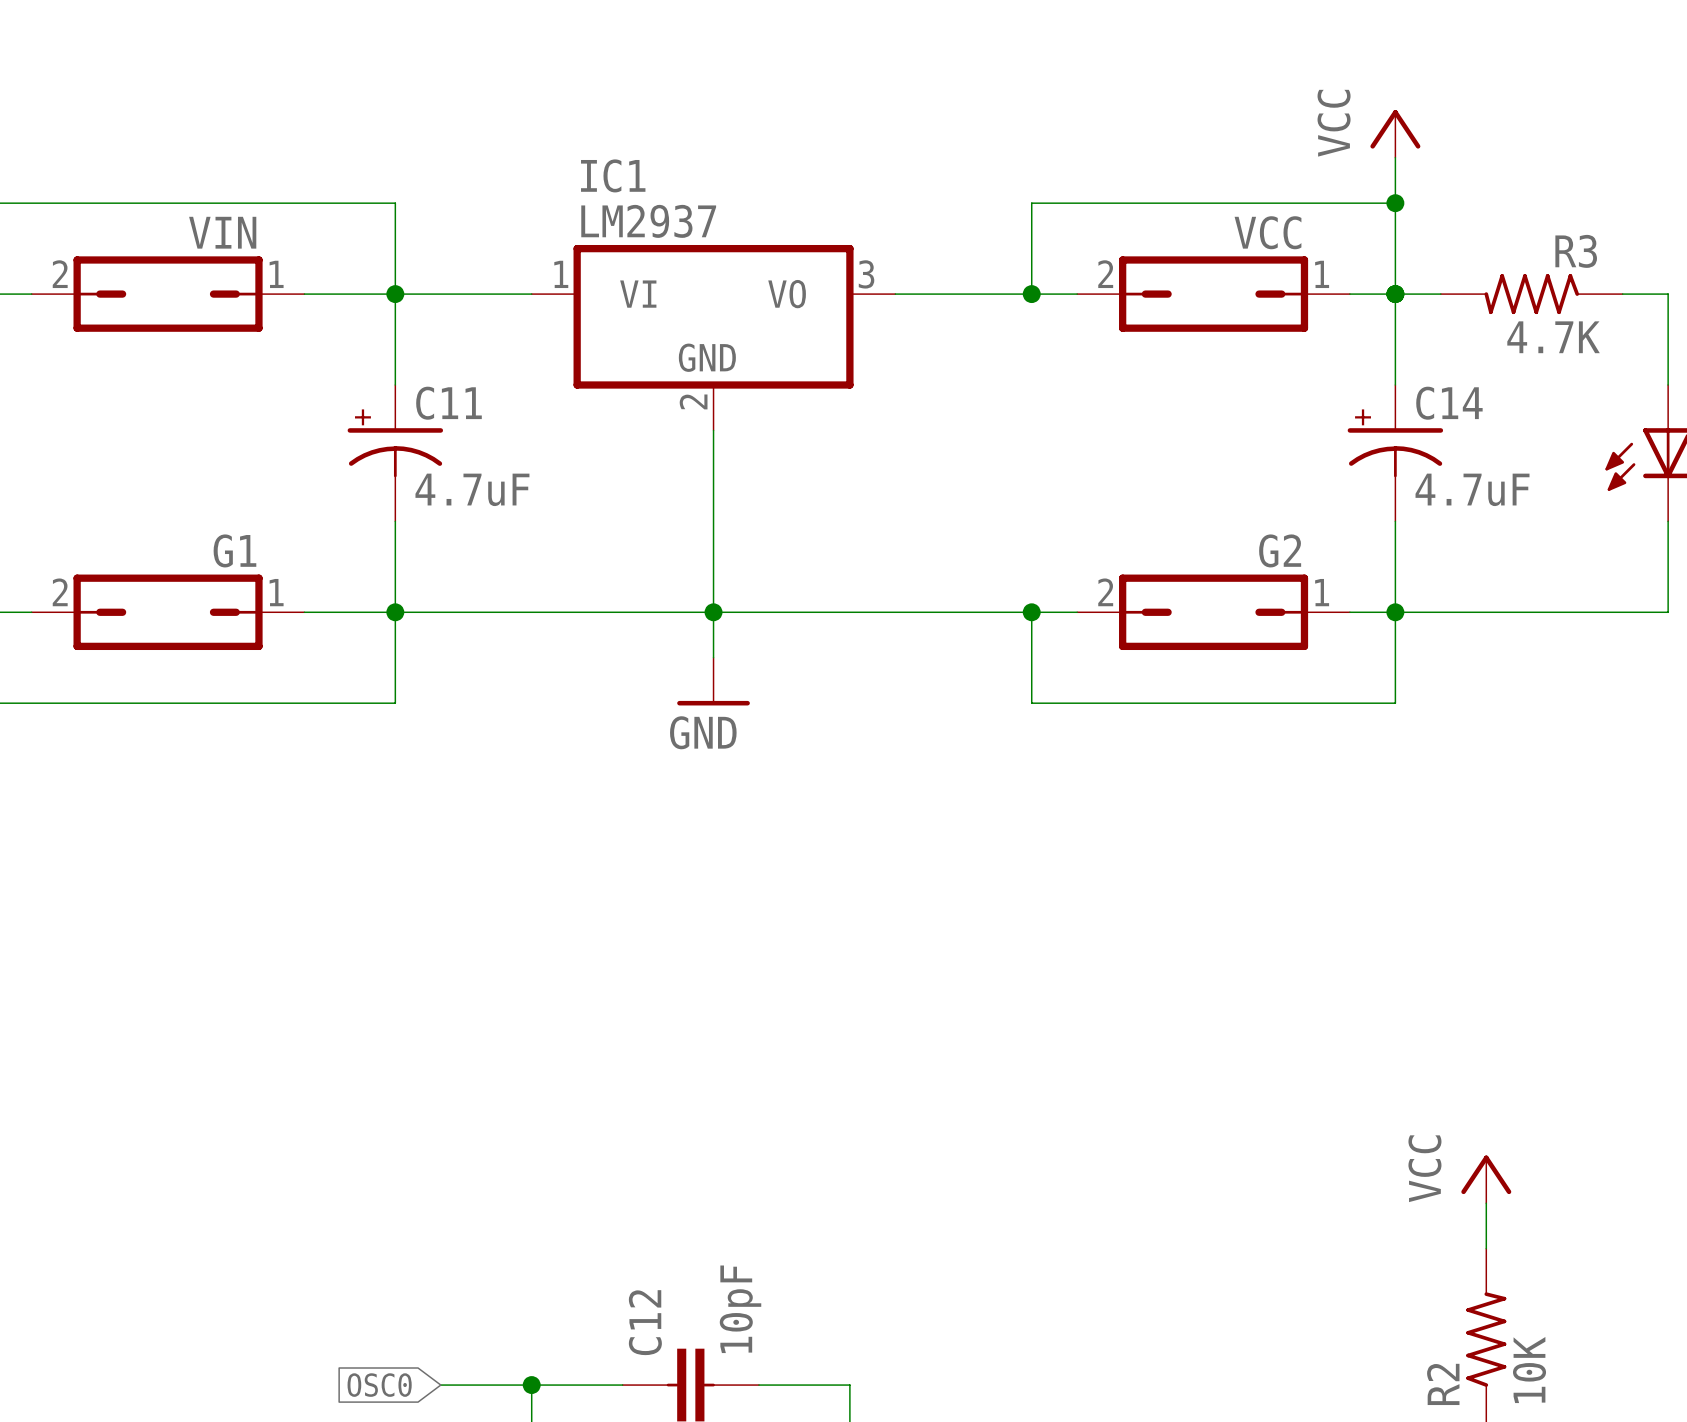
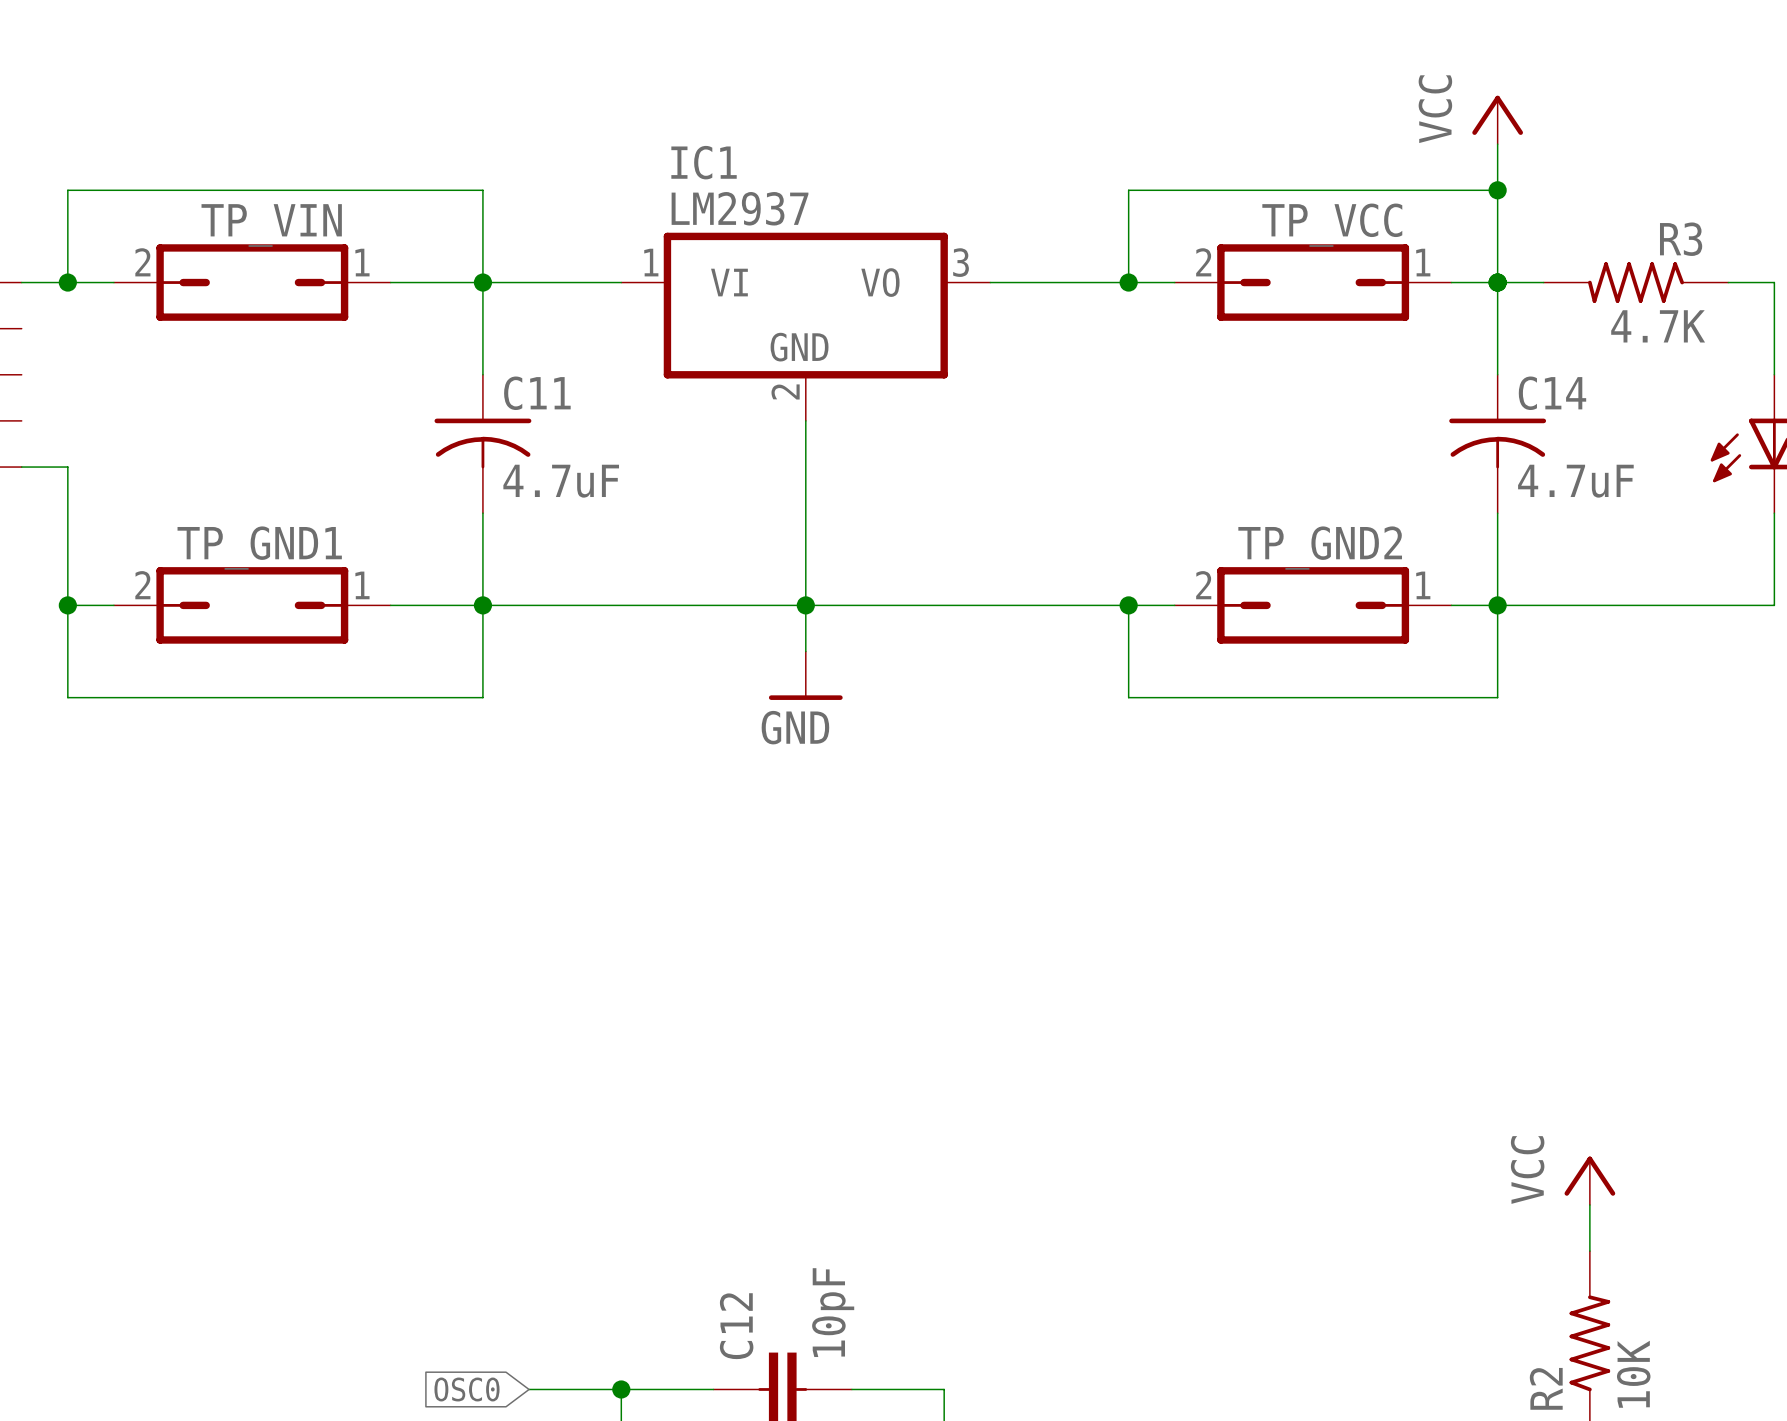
VIN name: VIN (222, 232) -> TP_VIN (271, 225)
VCC name: VCC (1268, 232) -> TP_VCC (1332, 225)
C11 symbol: [347, 384, 444, 522] -> [434, 374, 532, 514]
C14 symbol: [1347, 384, 1444, 522] -> [1449, 374, 1547, 514]
G1 name: G1 (234, 550) -> TP_GND1 (259, 548)
G2 name: G2 (1280, 550) -> TP_GND2 (1320, 548)

